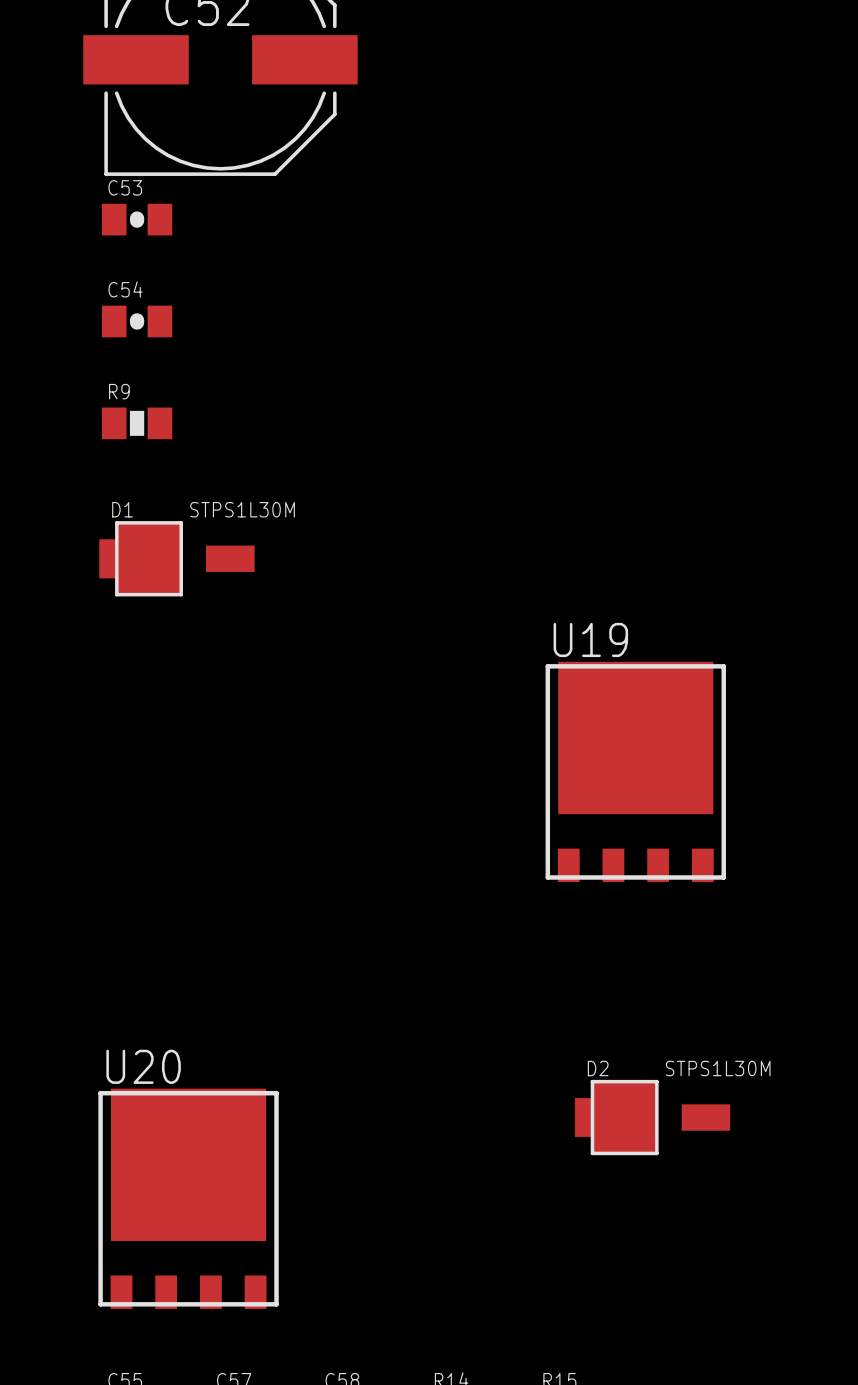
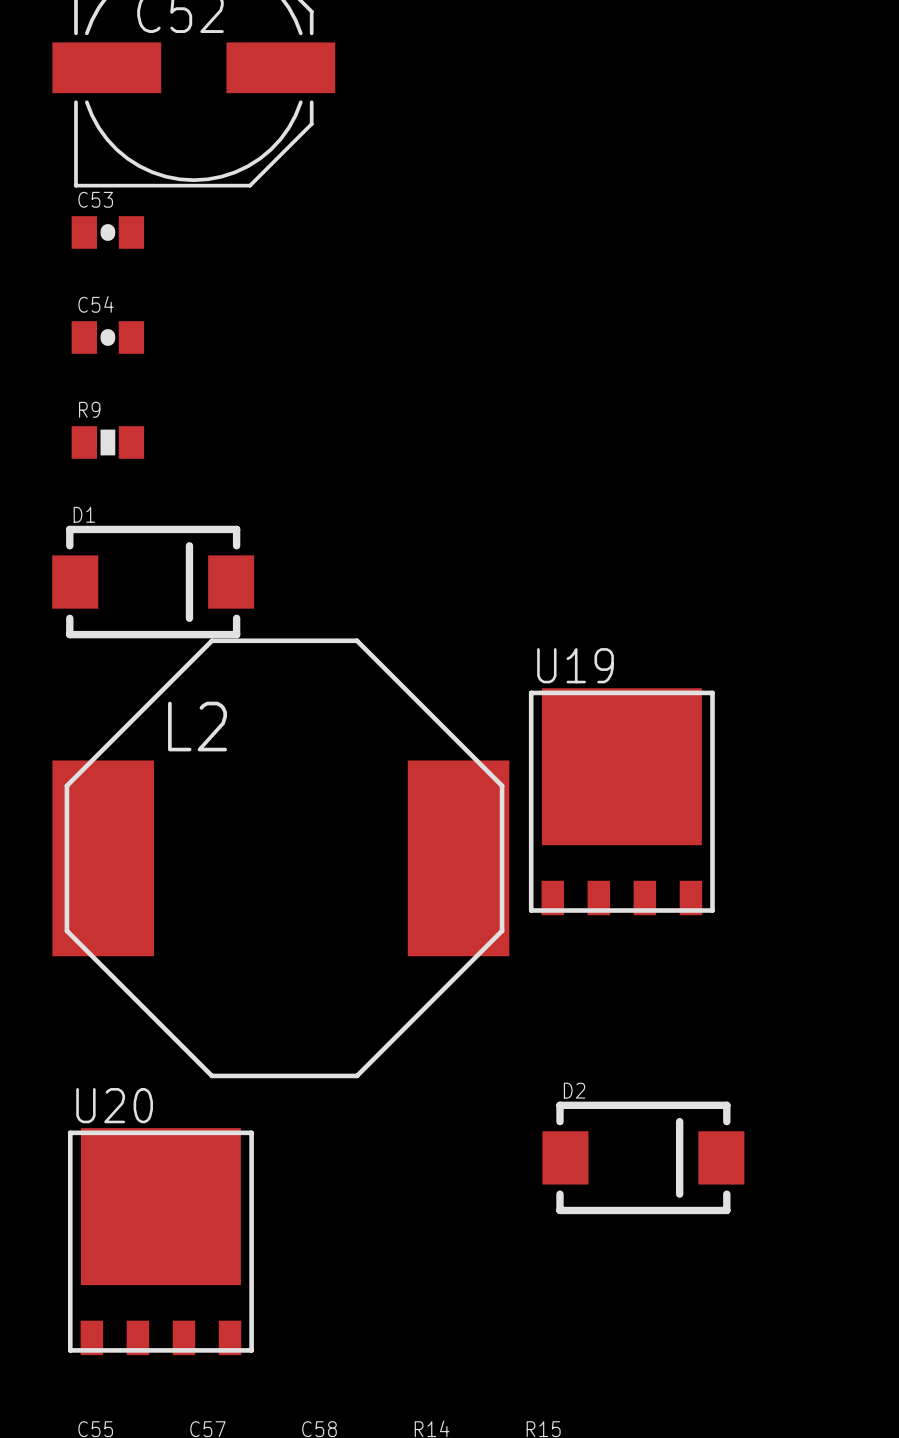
D1 value: STPS1L30M (242, 509) -> none
D1 footprint: [99, 521, 255, 597] -> [52, 525, 255, 639]
L2: none -> (280, 858)
D2 value: STPS1L30M (718, 1068) -> none
D2 footprint: [574, 1079, 731, 1156] -> [542, 1101, 745, 1215]

